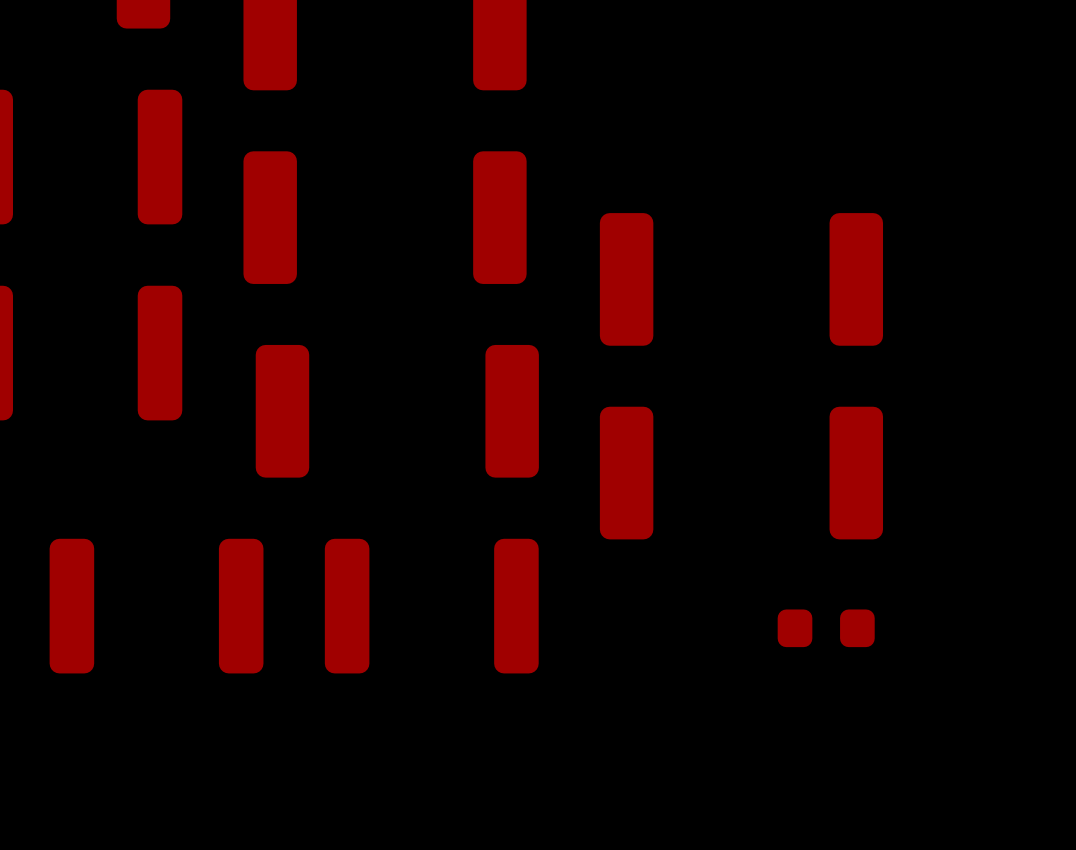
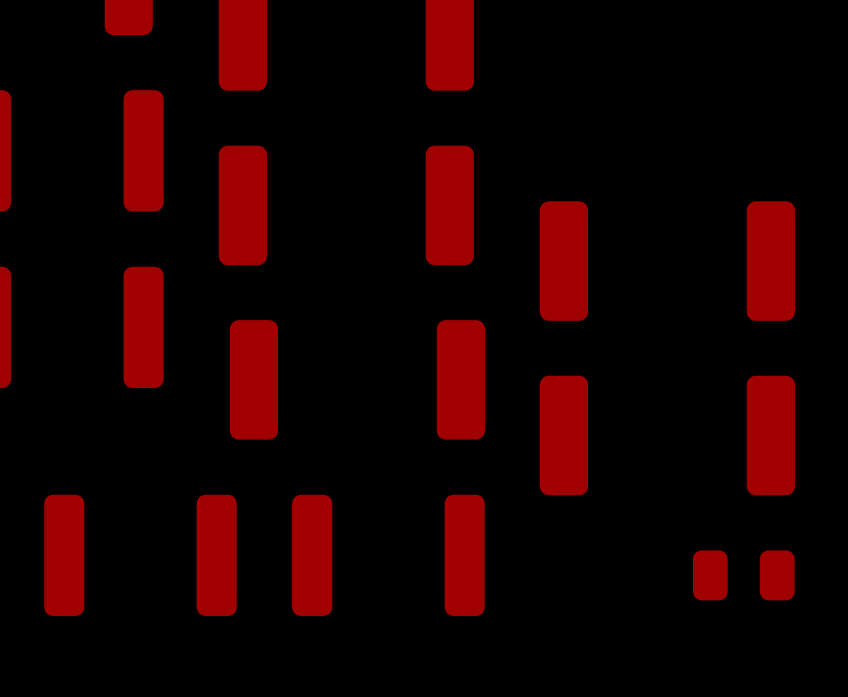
part footprint: [777, 609, 875, 648] -> [692, 550, 795, 601]

